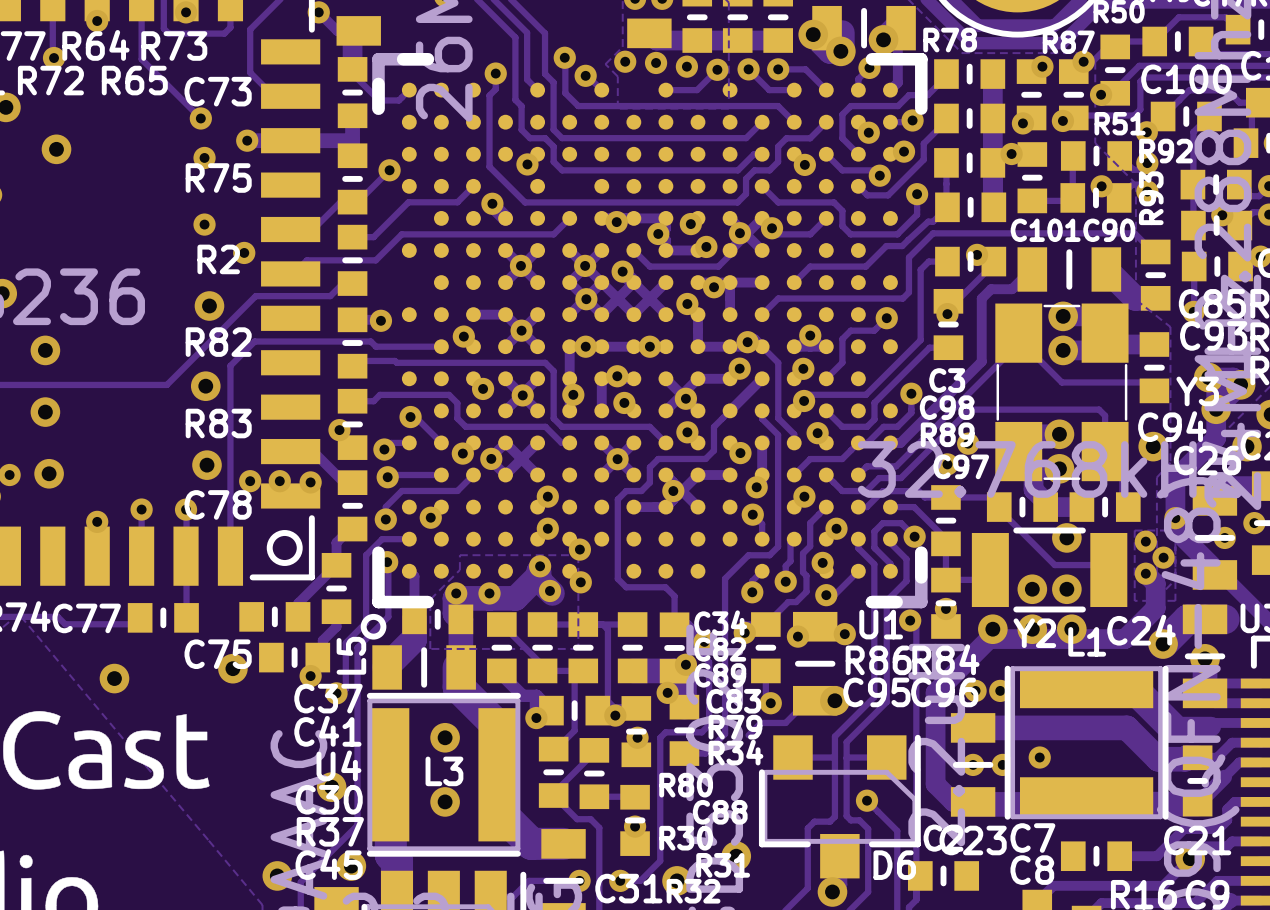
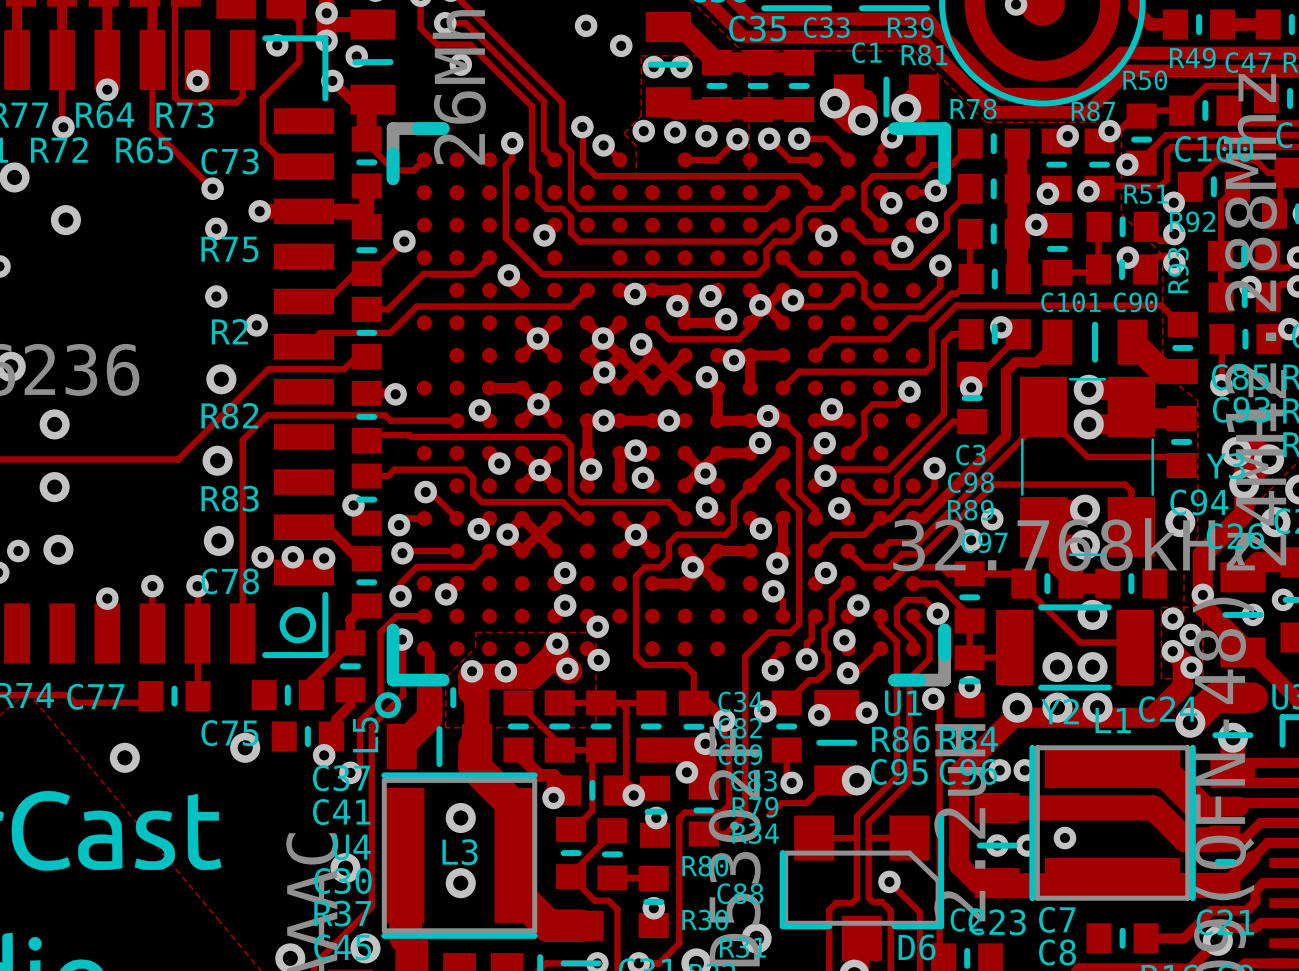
via: none -> (1191, 667)

